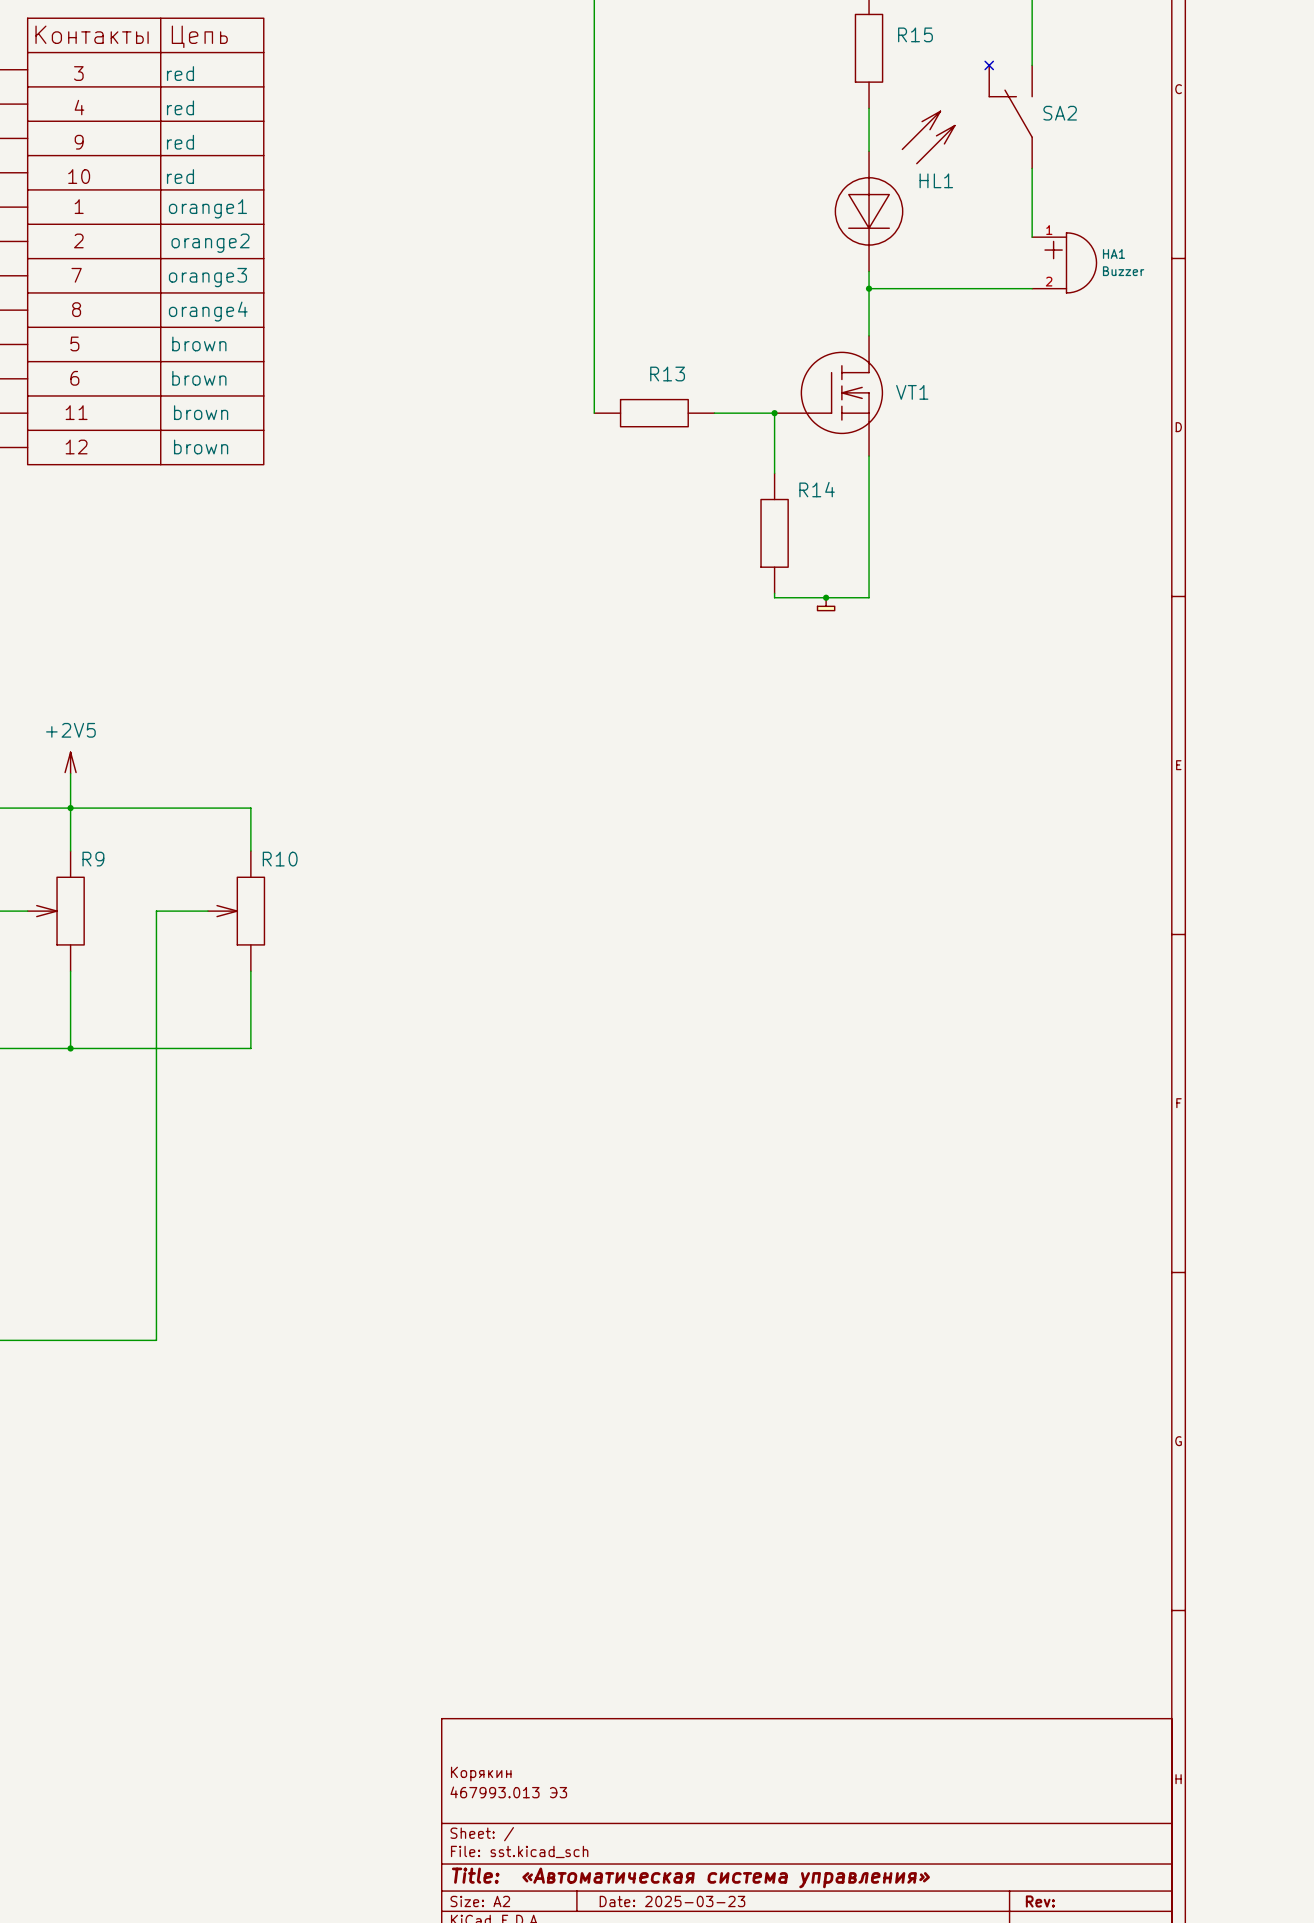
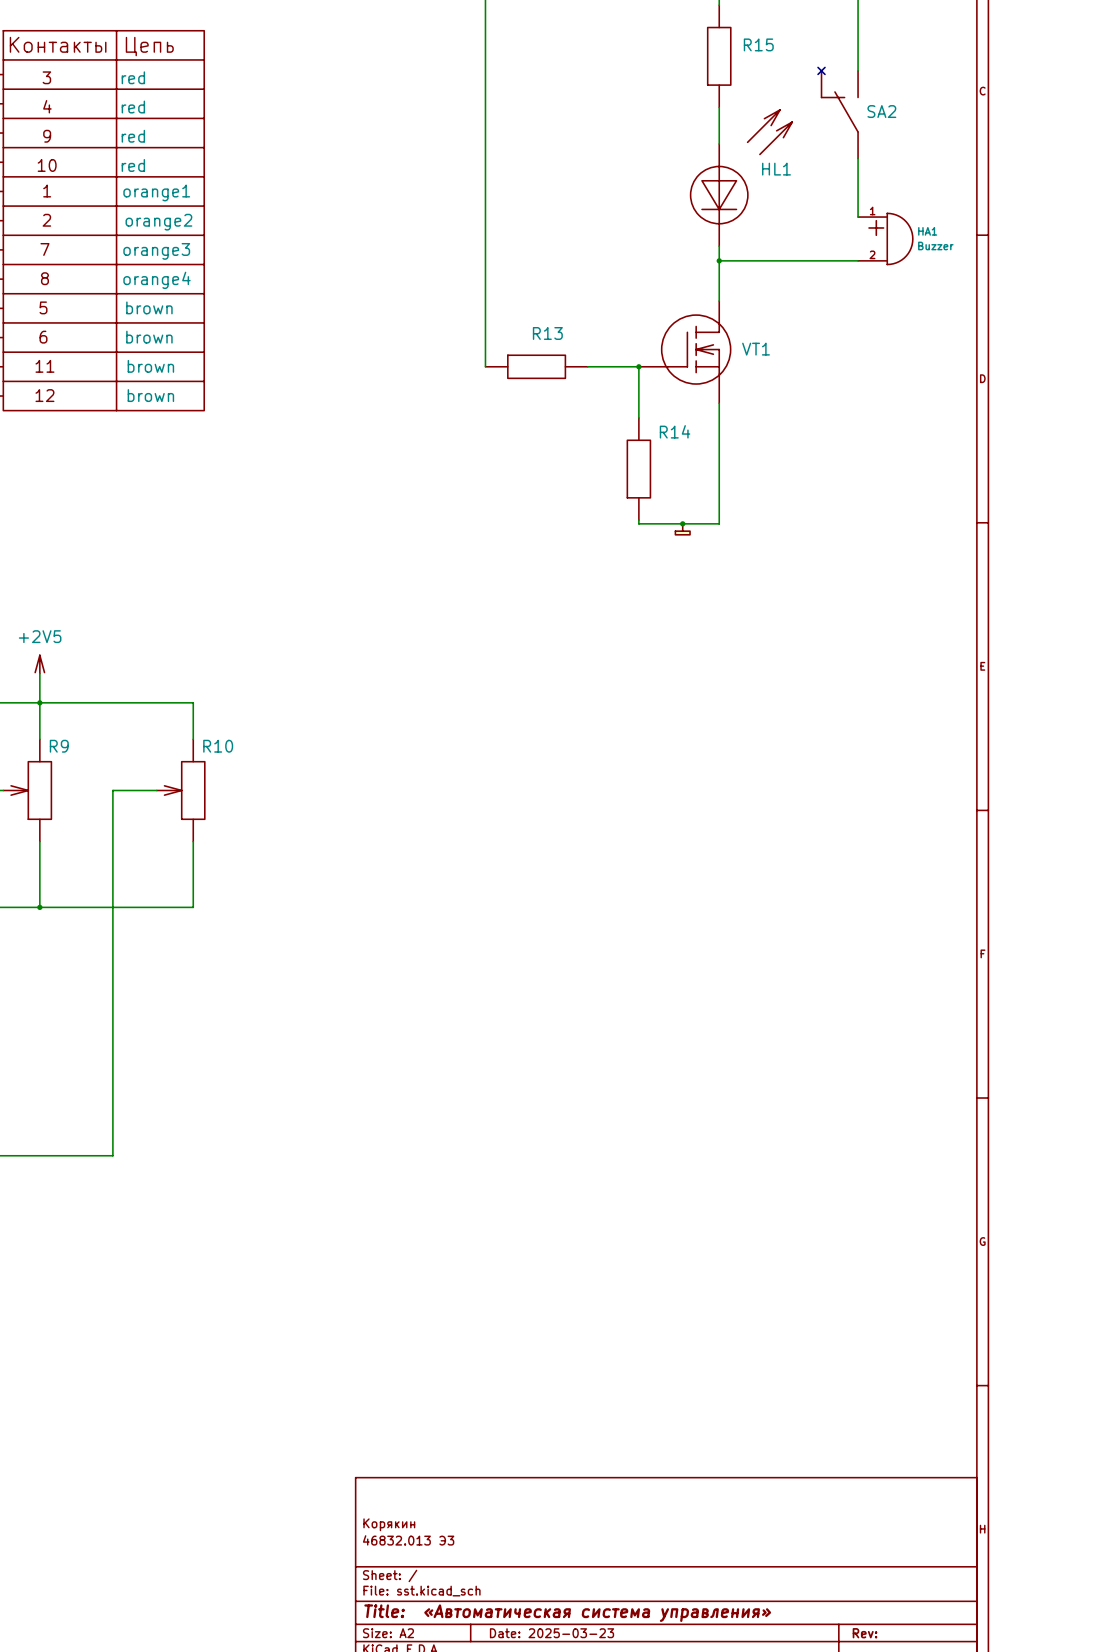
title block: 467993.013 Э3 (508, 1792) -> 46832.013 Э3 (408, 1540)

